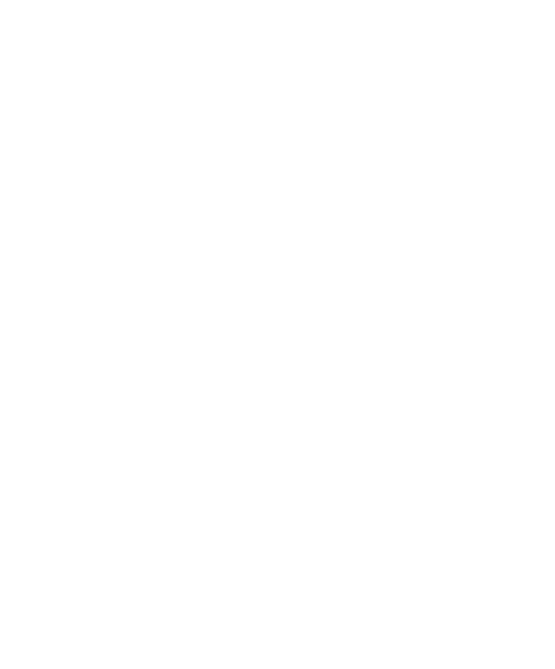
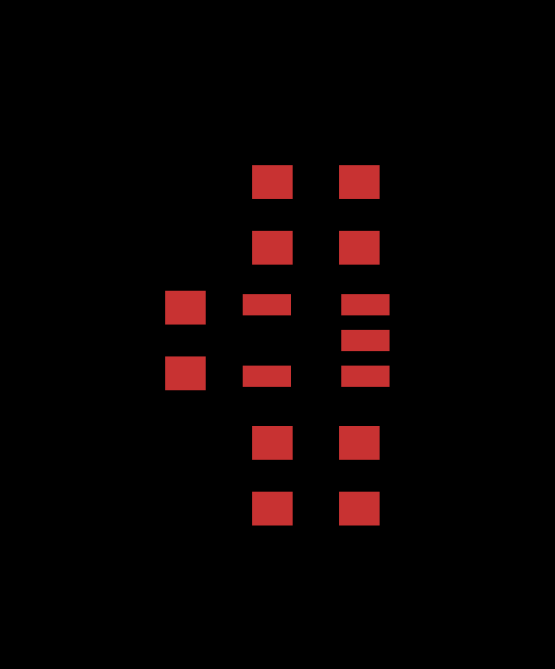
part: none -> (272, 214)
part: none -> (359, 214)
part: none -> (185, 340)
part: none -> (316, 340)
part: none -> (272, 475)
part: none -> (359, 475)

